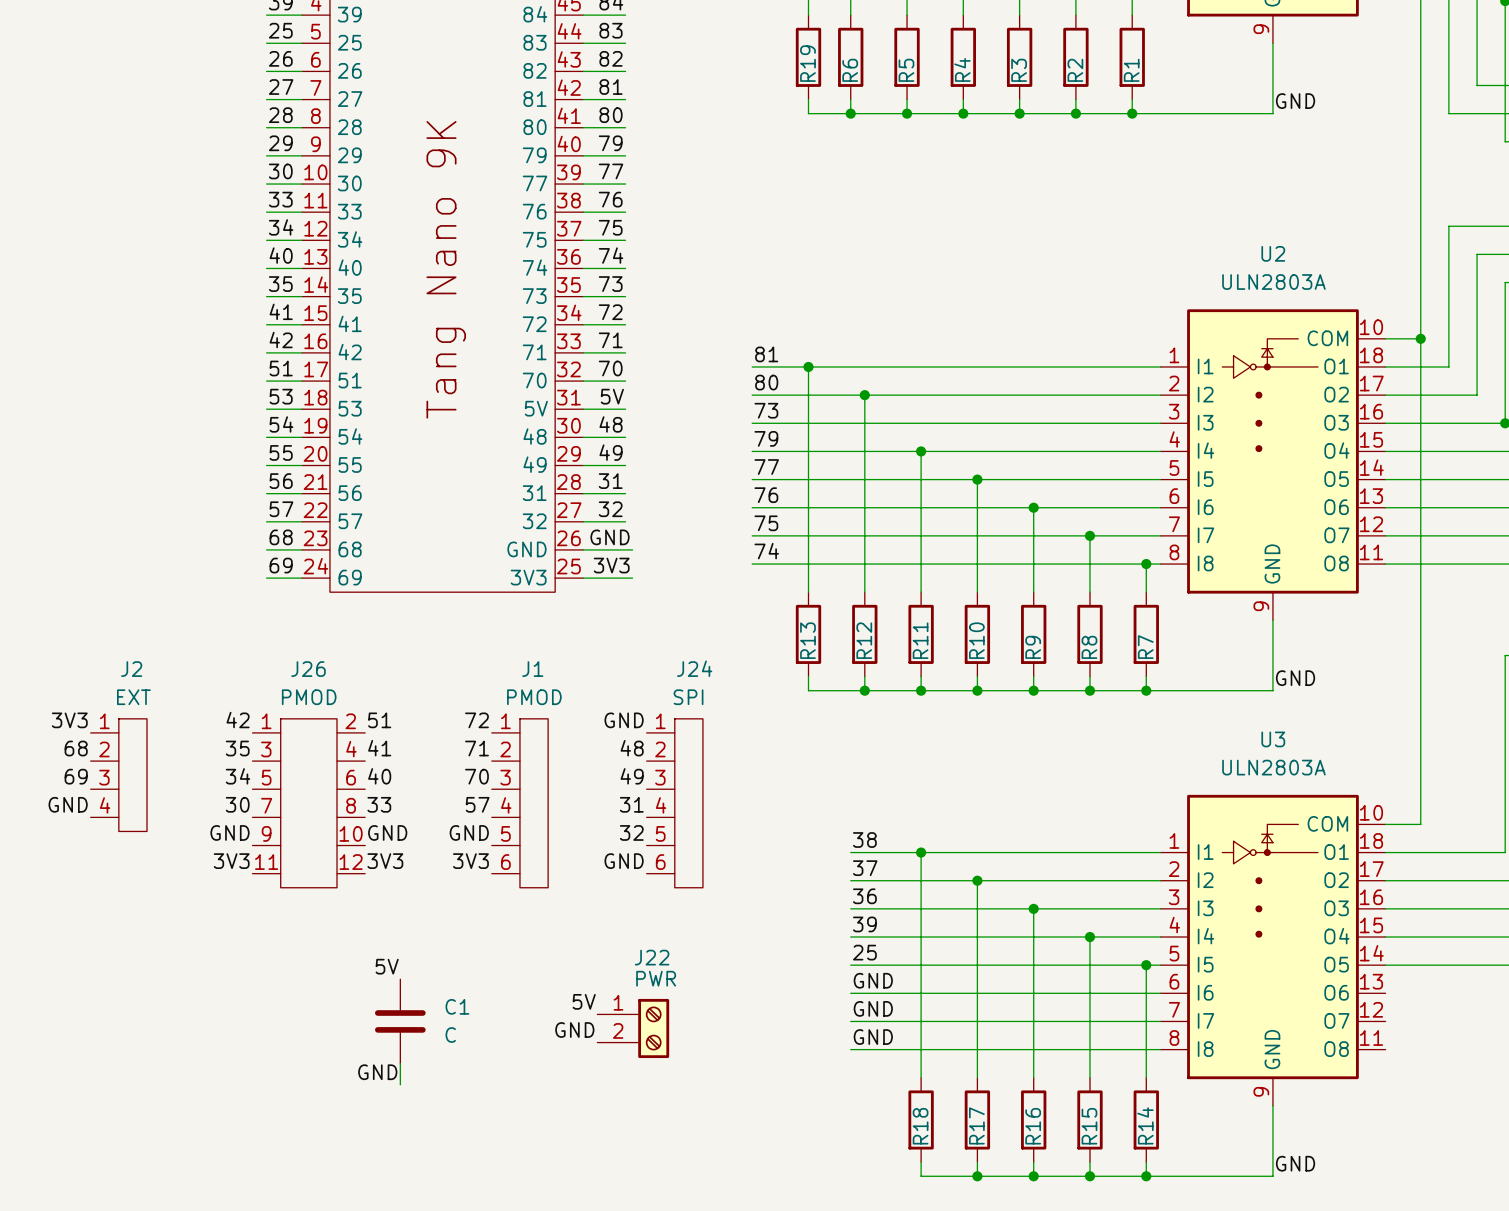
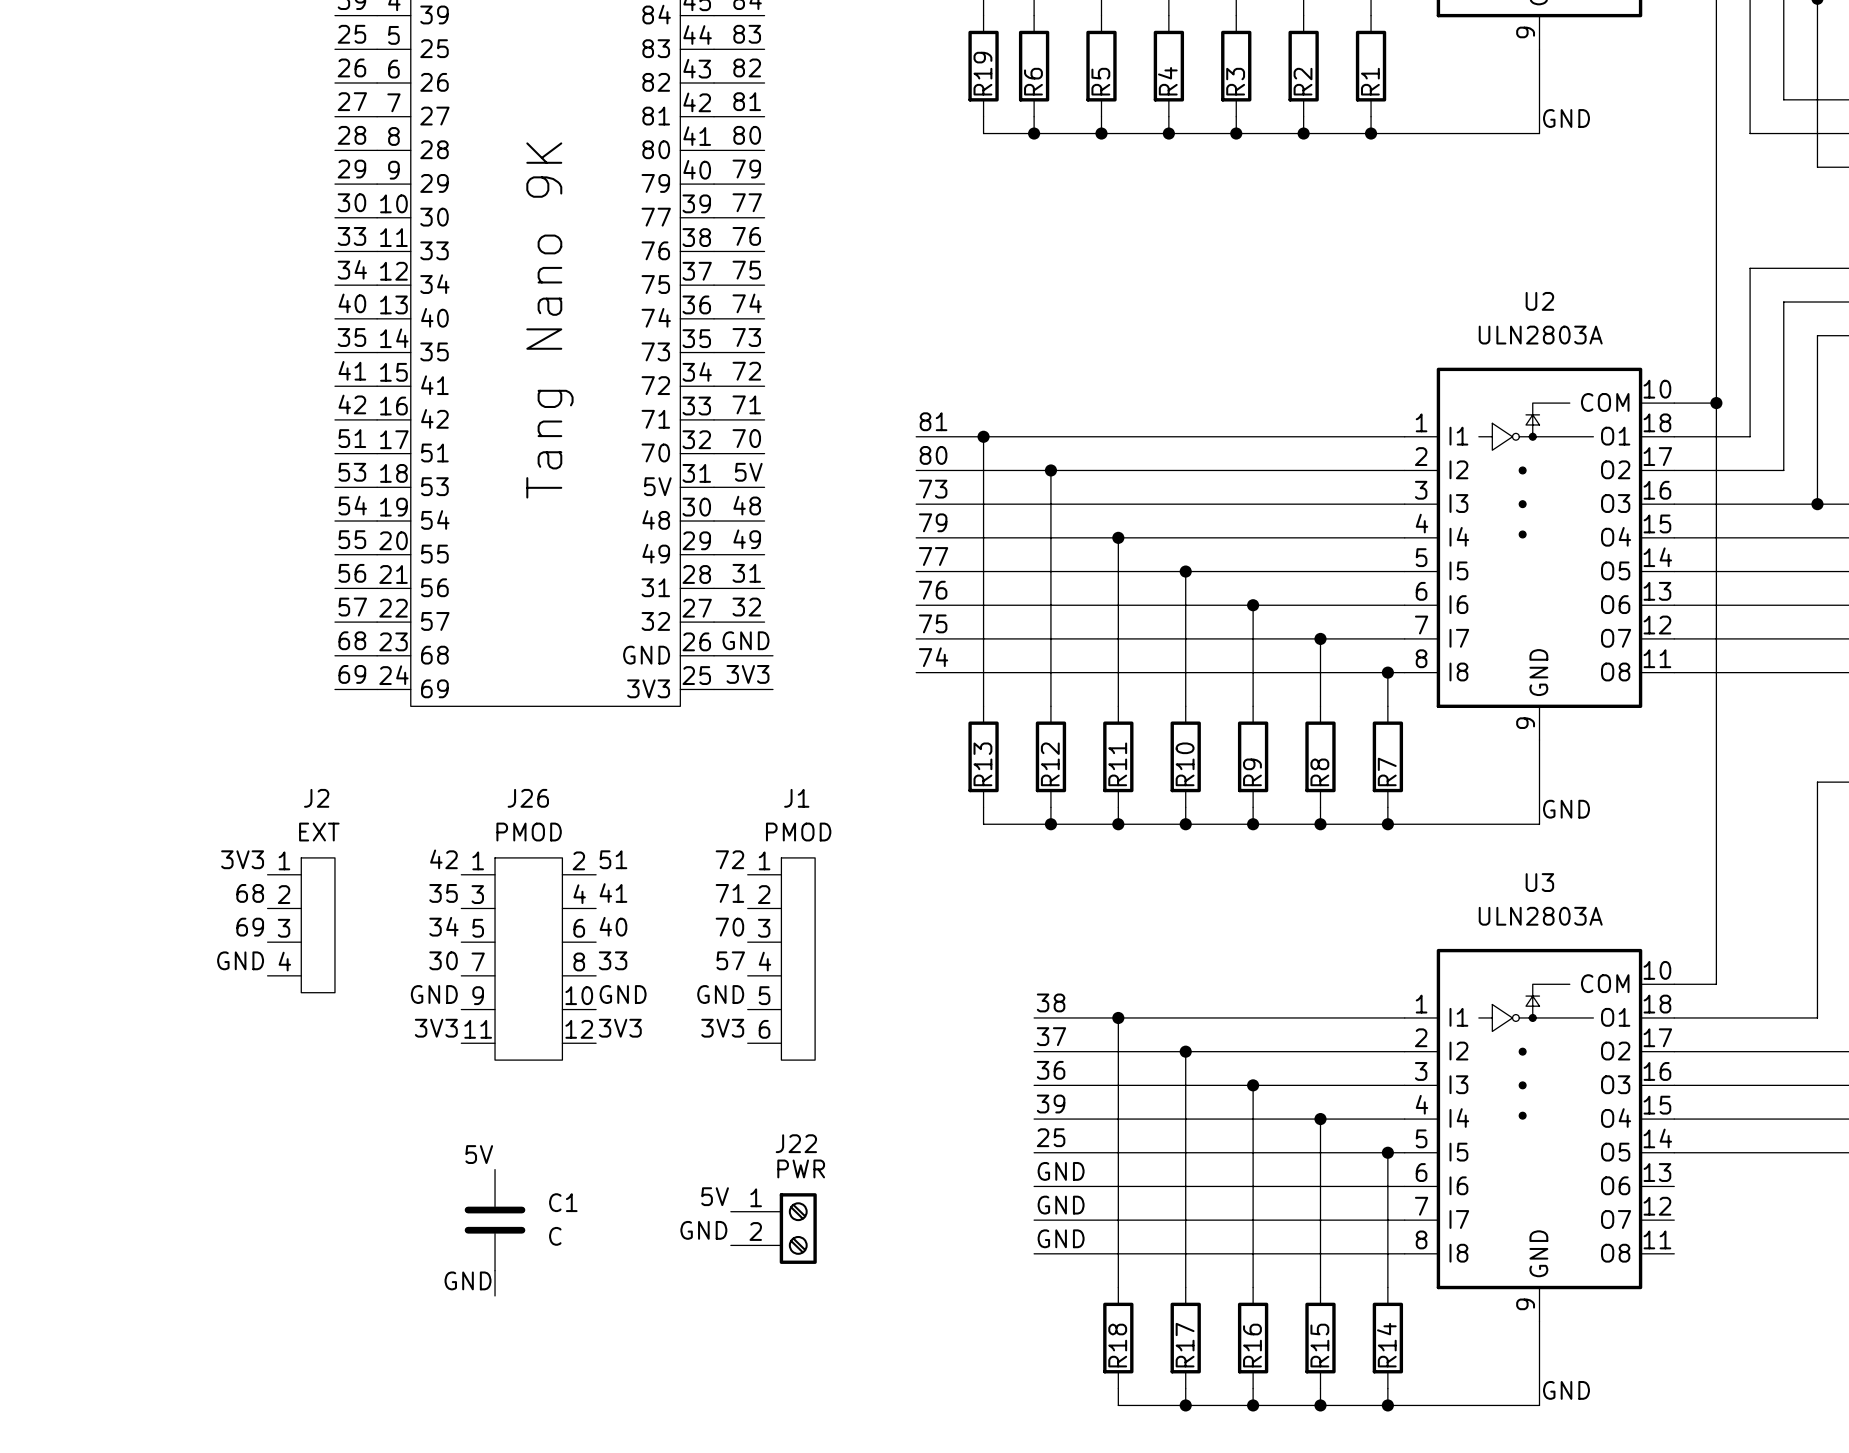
label: 3V3 (69, 720) -> none
label: none -> 3V3 (242, 859)
label position: 42 (238, 720) -> 42 (443, 859)
label position: 51 (379, 720) -> 51 (613, 859)
label position: 72 (476, 720) -> 72 (729, 859)
label: GND (624, 720) -> none
label position: 68 (76, 748) -> 68 (250, 893)
label position: 35 (237, 748) -> 35 (443, 893)
label position: 41 (379, 748) -> 41 (613, 893)
label position: 71 (476, 748) -> 71 (729, 893)
label: 48 (632, 748) -> none
J2 position: (118, 775) -> (301, 925)
label position: 69 (76, 776) -> 69 (250, 927)
label position: 34 (238, 776) -> 34 (443, 926)
label position: 40 (379, 776) -> 40 (613, 926)
label position: 70 (476, 776) -> 70 (729, 927)
label: 49 (632, 776) -> none
J26 position: (308, 803) -> (528, 959)
J1 position: (519, 803) -> (781, 959)
J24: SPI (674, 803) -> none
label: GND (68, 804) -> none
label position: 30 (237, 804) -> 30 (443, 960)
label position: 33 (379, 804) -> 33 (613, 960)
label position: 57 (477, 804) -> 57 (730, 960)
label: 31 (631, 804) -> none
label position: GND (229, 832) -> GND (240, 960)
label position: GND (387, 832) -> GND (434, 994)
label position: GND (469, 832) -> GND (623, 994)
label: 32 (631, 832) -> none
label: 3V3 (231, 861) -> none
label position: 3V3 (385, 861) -> 3V3 (436, 1028)
label position: 3V3 (470, 861) -> 3V3 (620, 1028)
label: none -> 3V3 (722, 1028)
label position: GND (624, 861) -> GND (720, 994)

